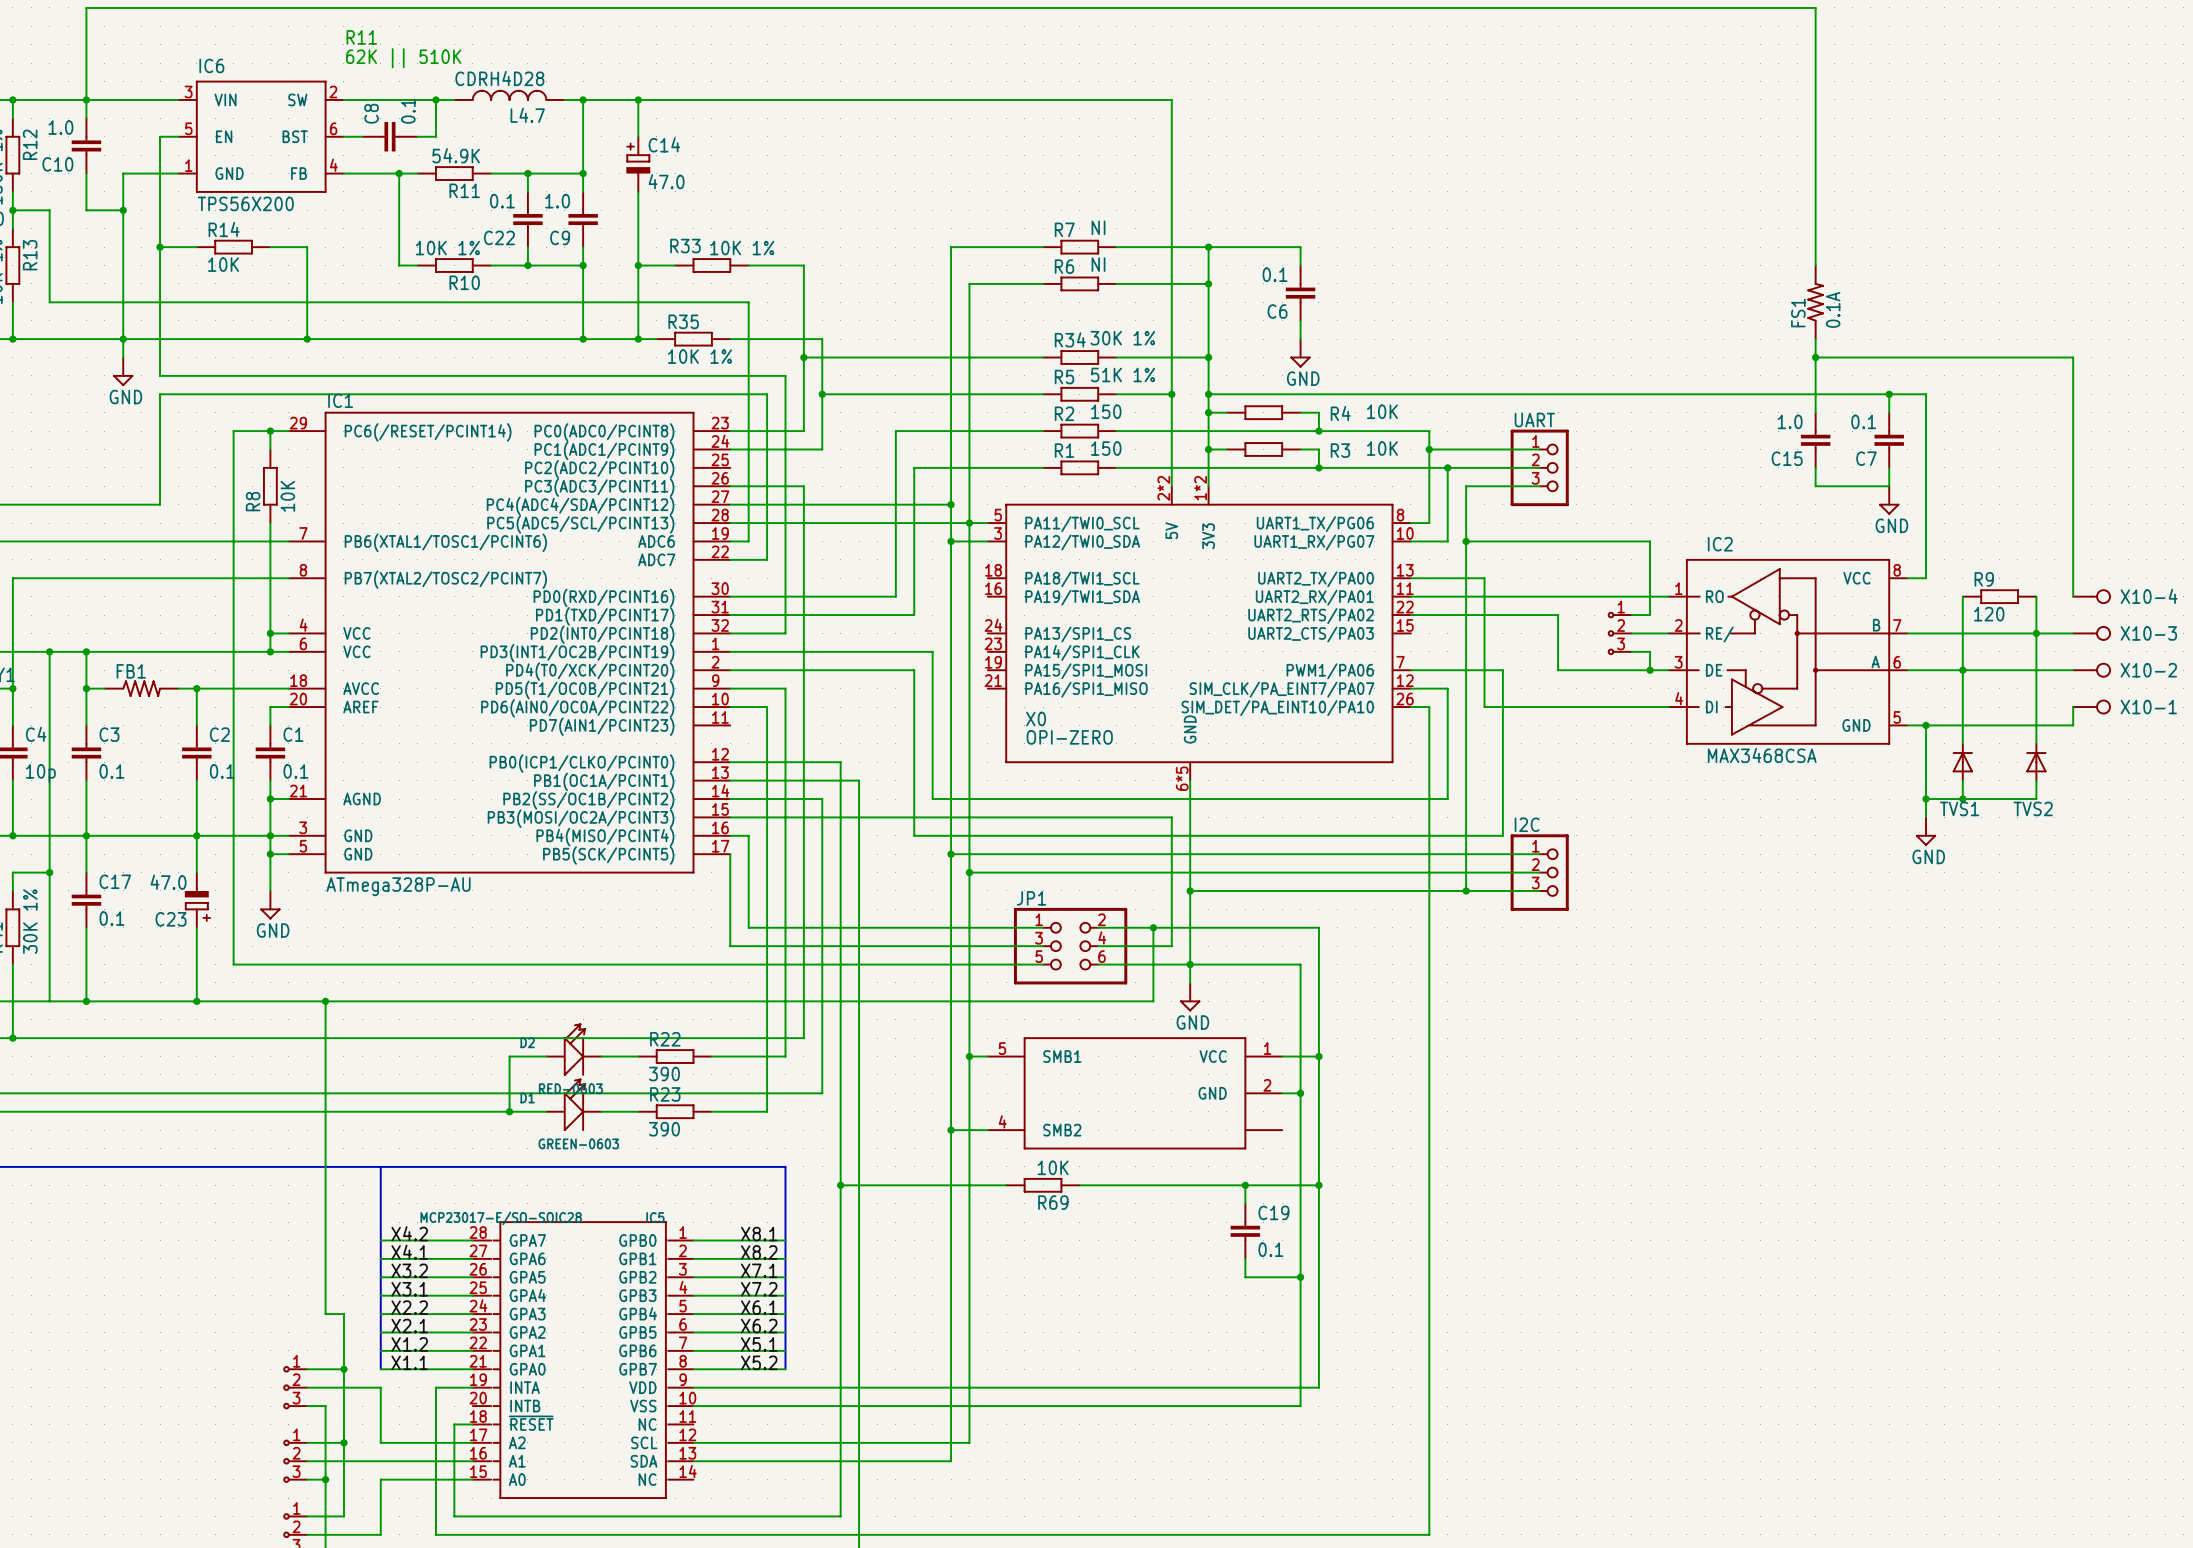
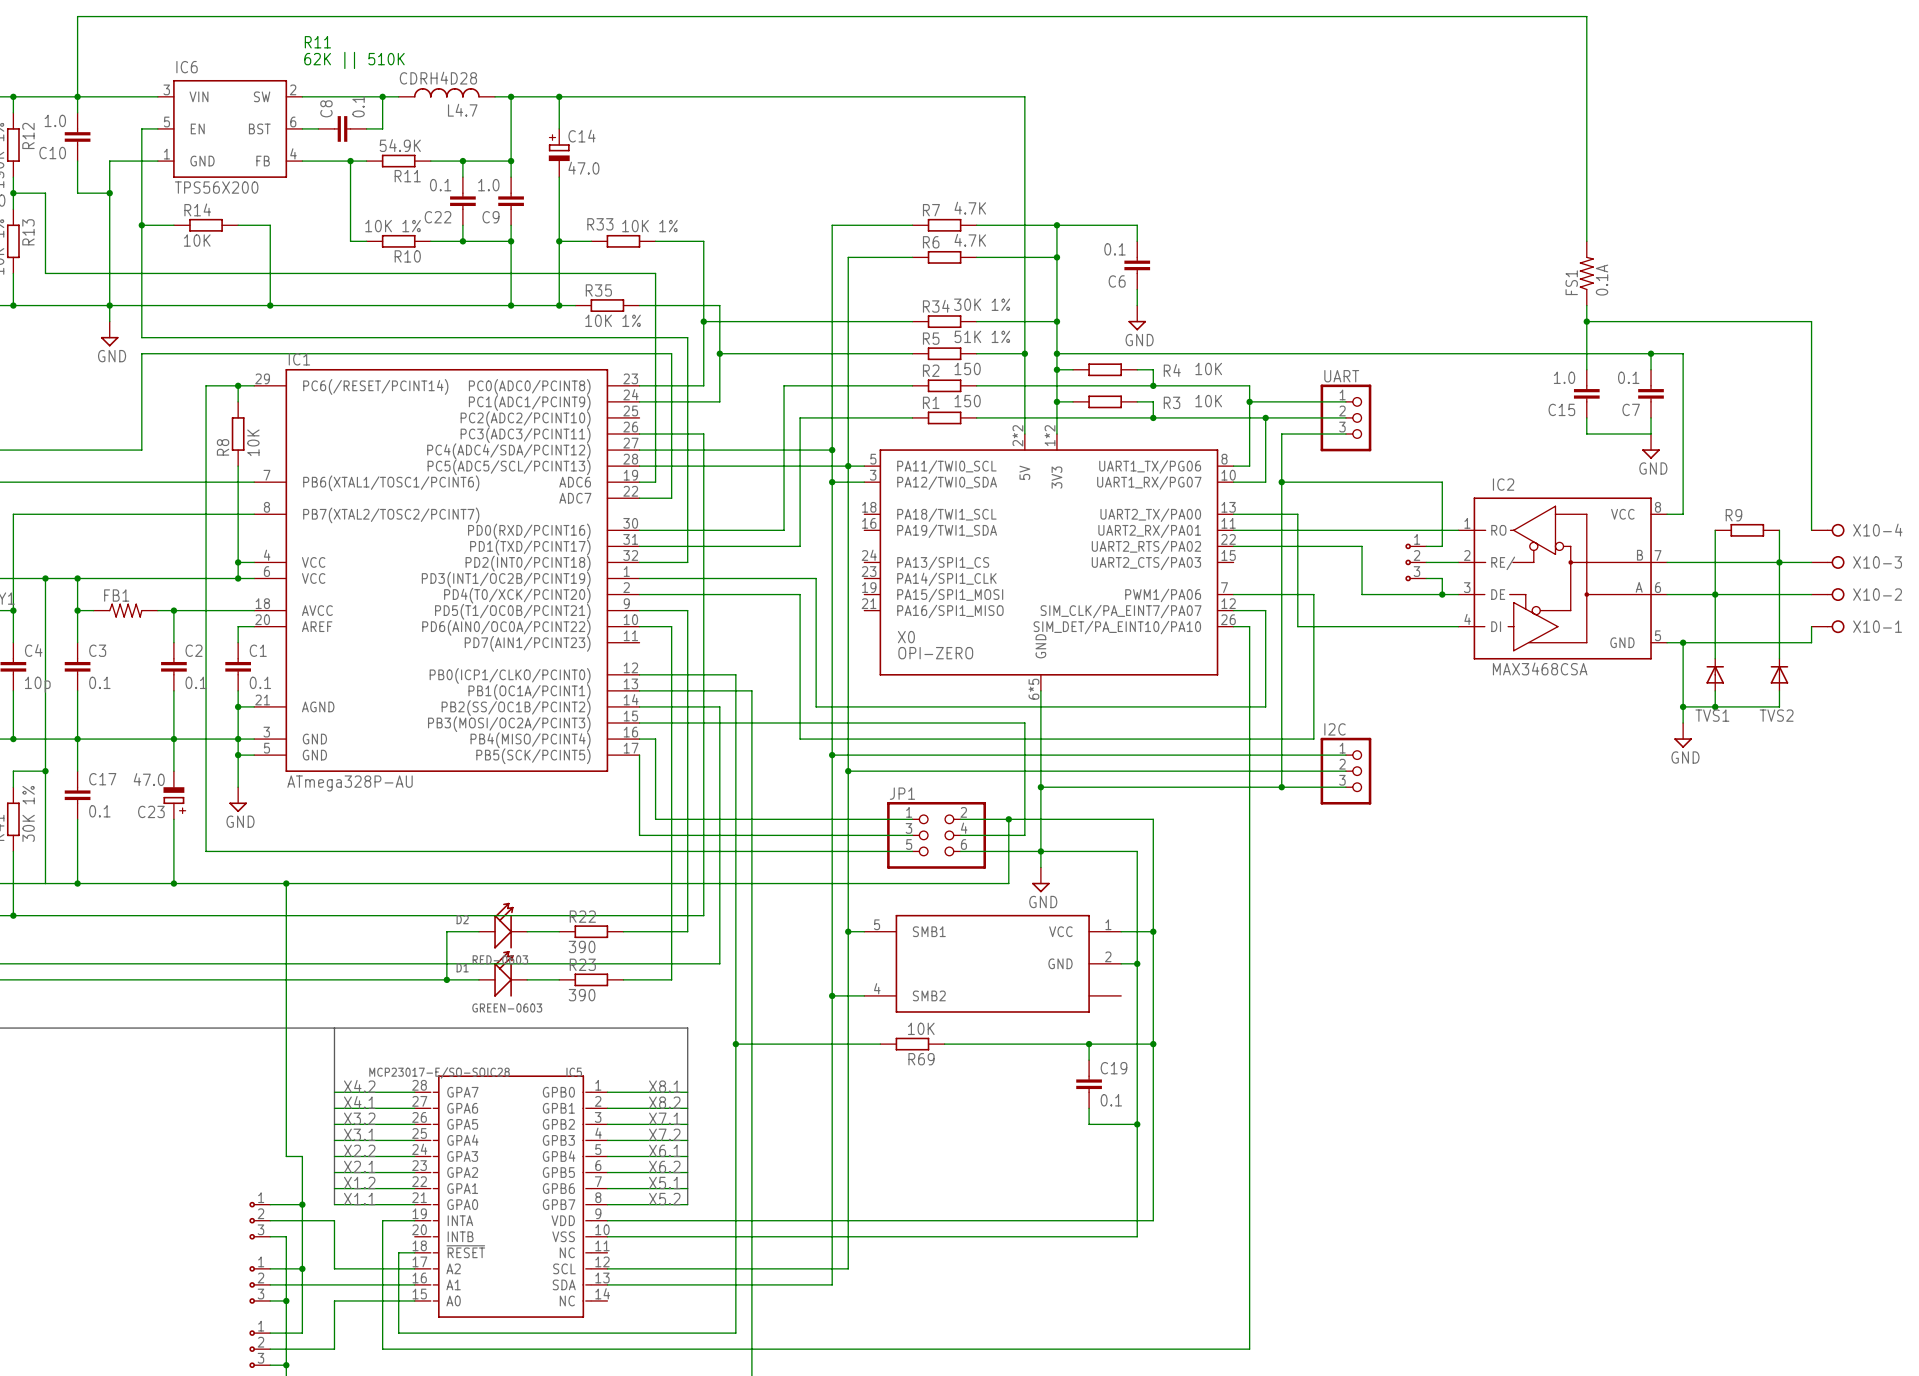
R7 value: NI (1098, 227) -> 4.7K (970, 208)
R6 value: NI (1098, 264) -> 4.7K (970, 240)
R9 value: 120 (1989, 614) -> none

